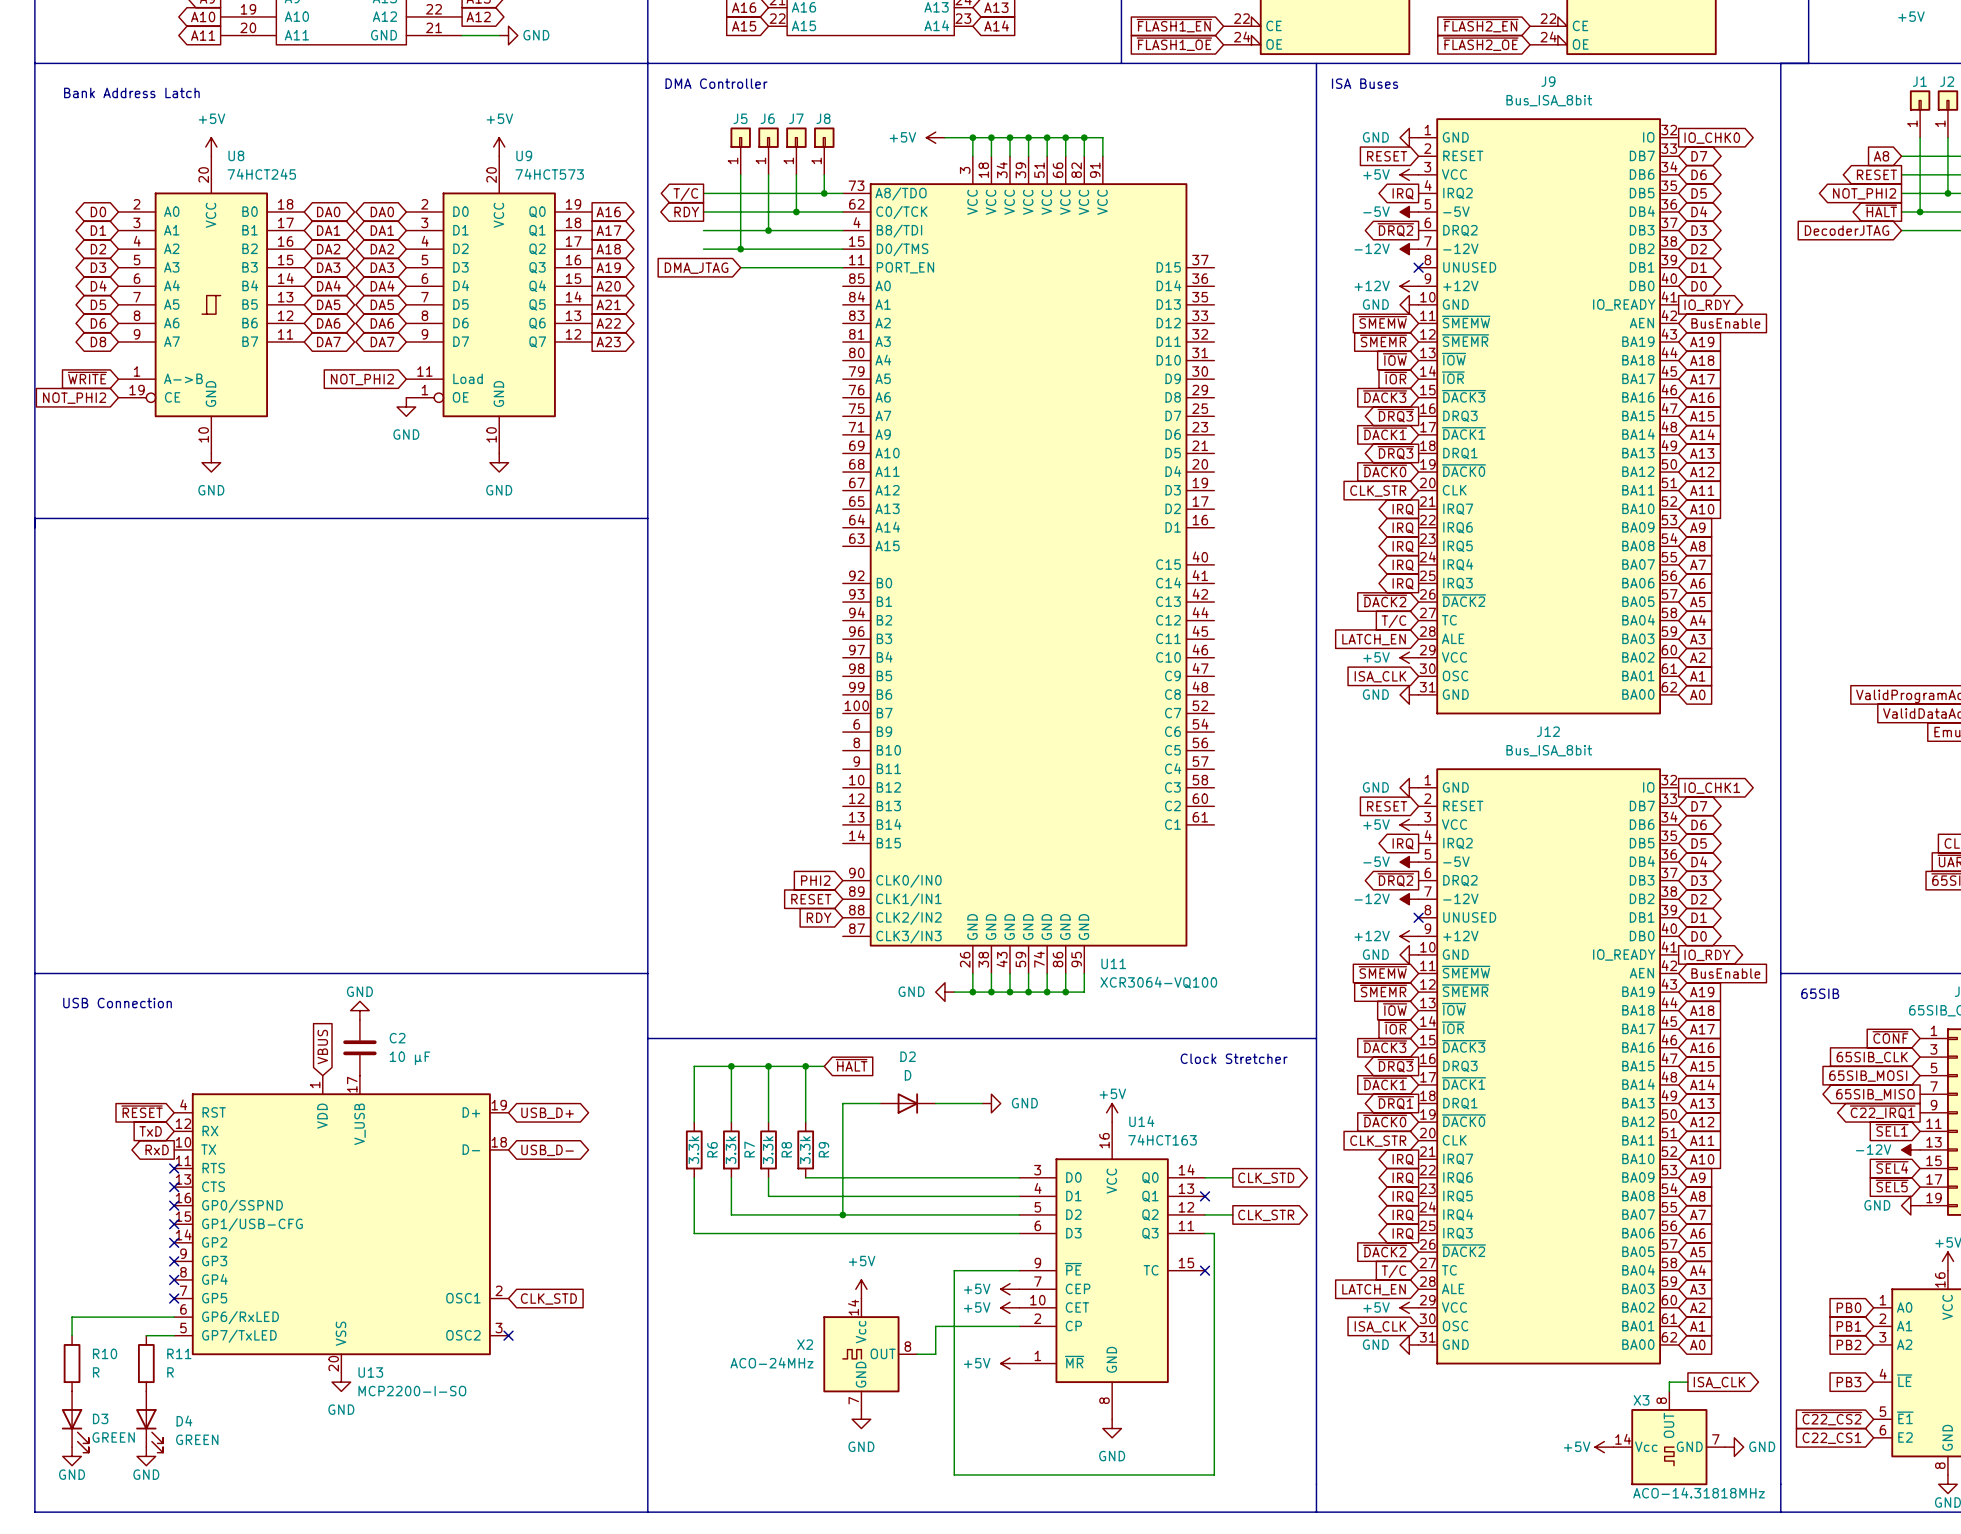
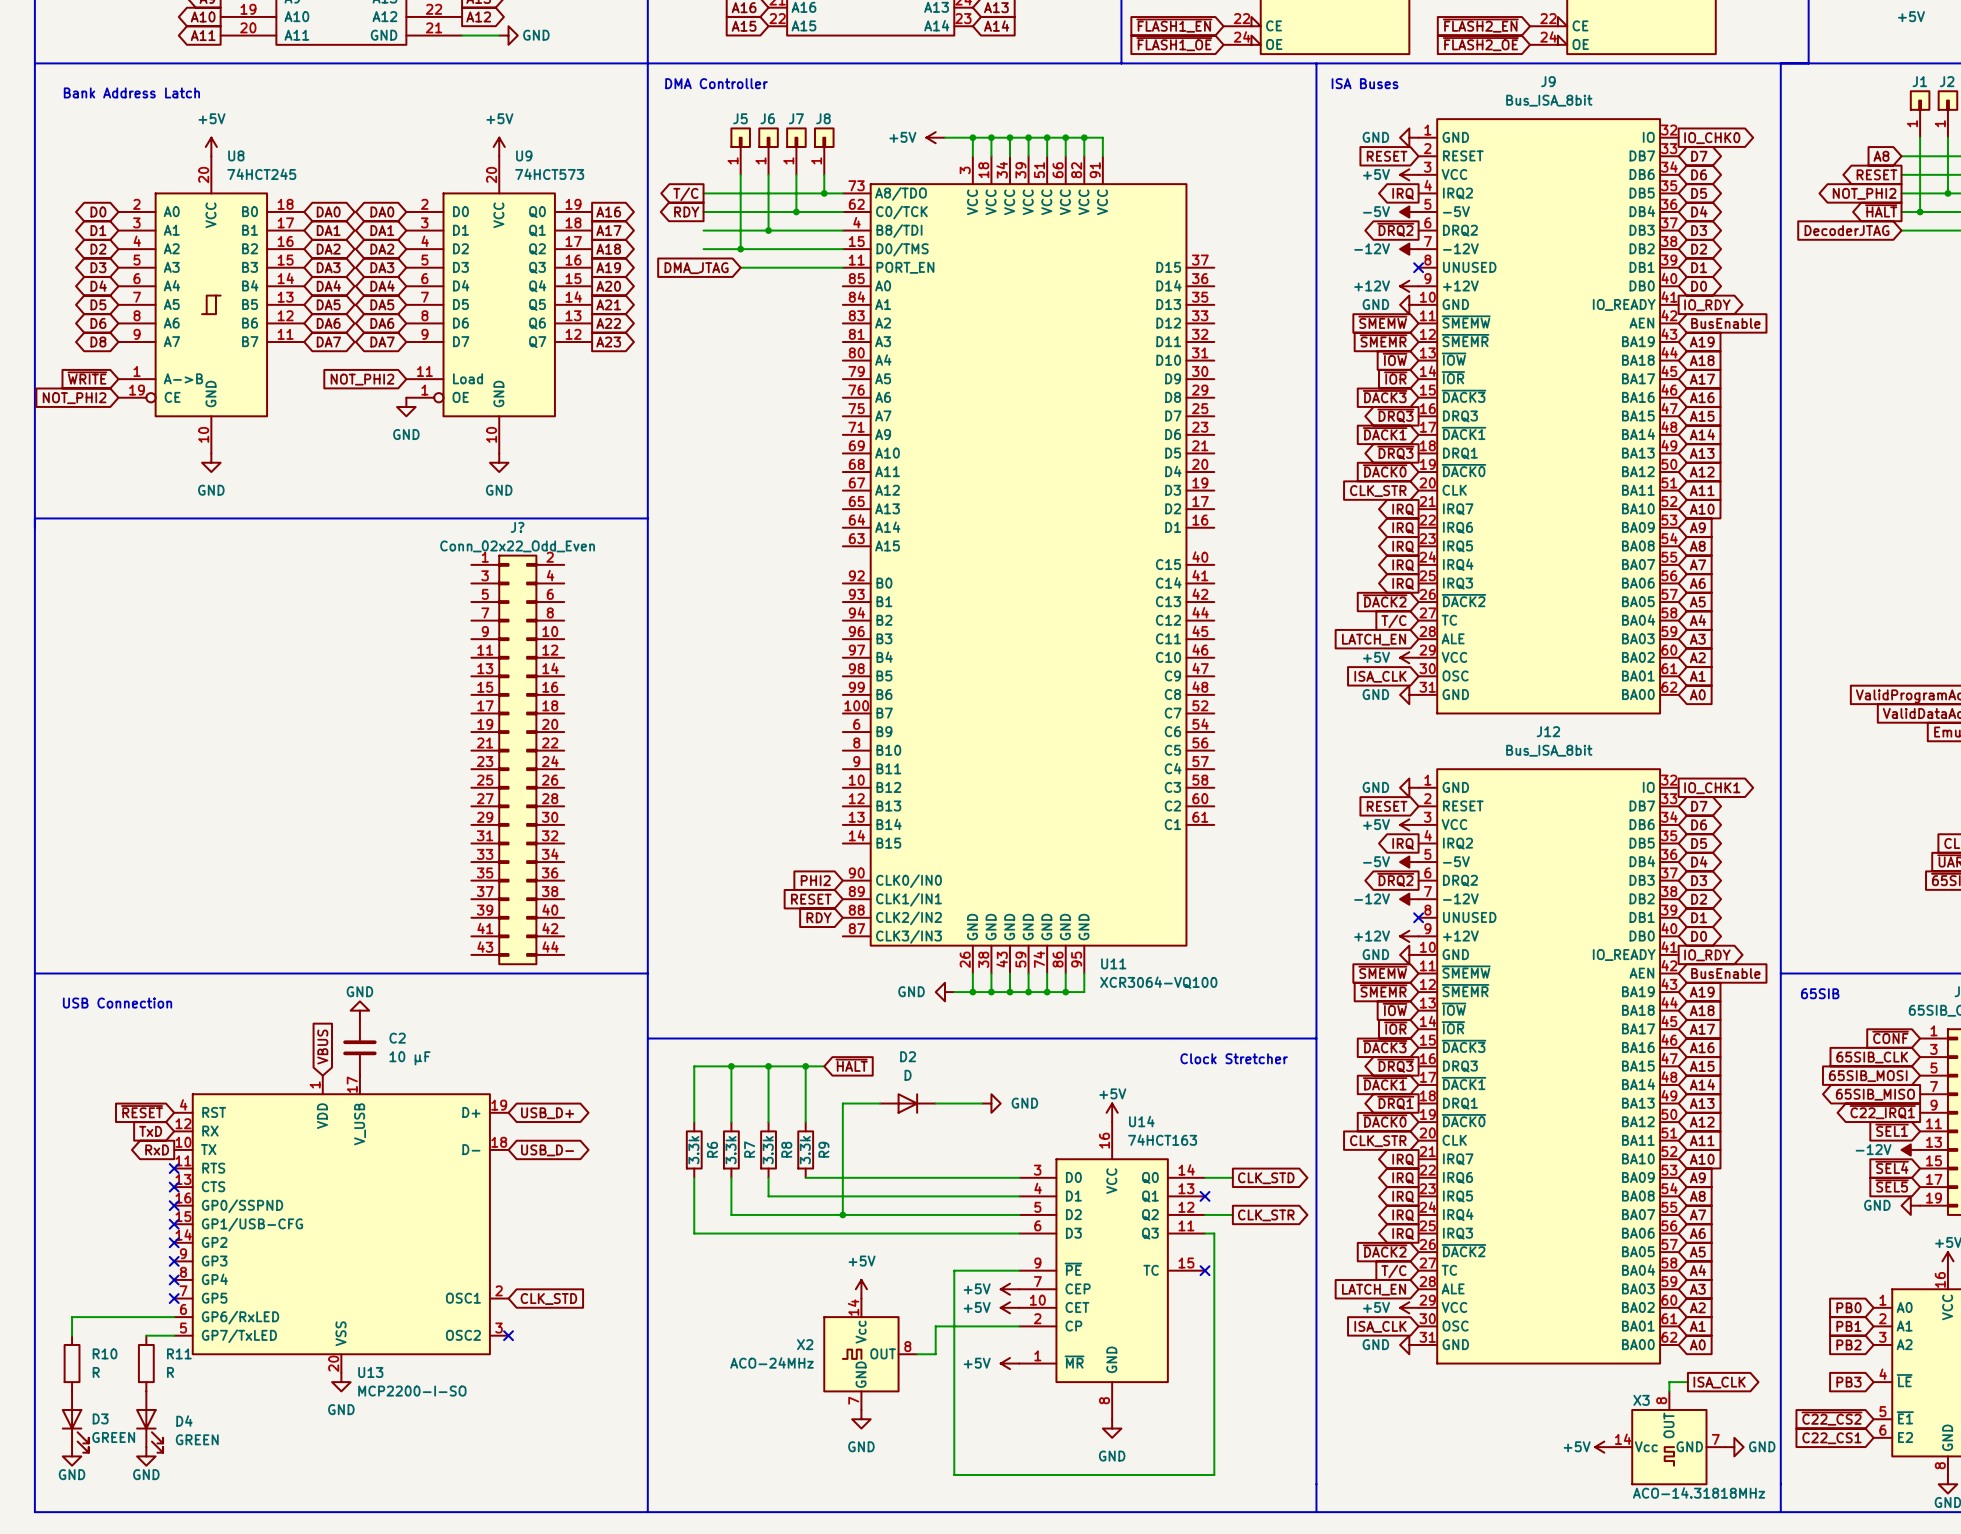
J?: none -> Conn_02x22_Odd_Even (517, 759)

